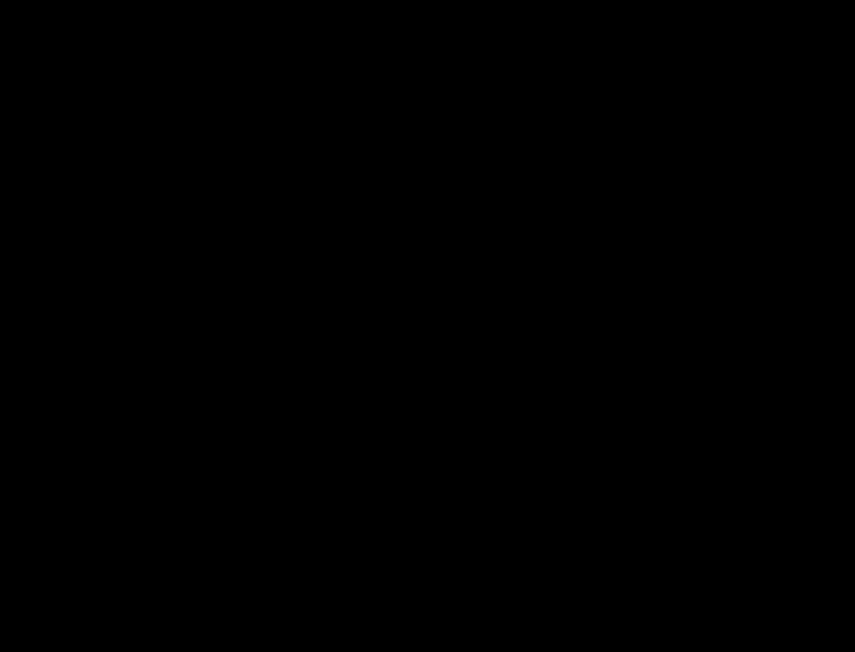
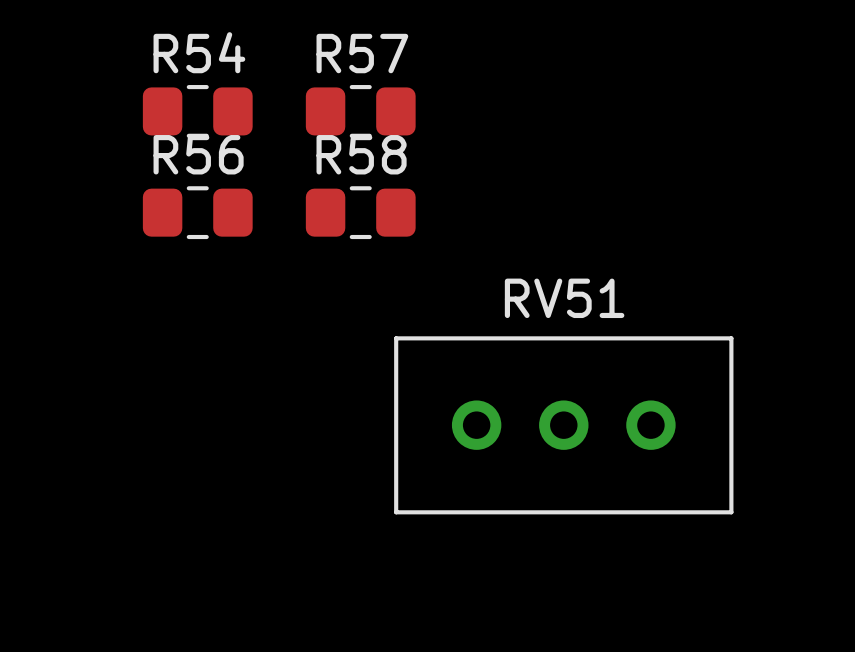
R54: none -> (197, 111)
R57: none -> (360, 111)
R56: none -> (197, 212)
R58: none -> (360, 212)
RV51: none -> (563, 425)

